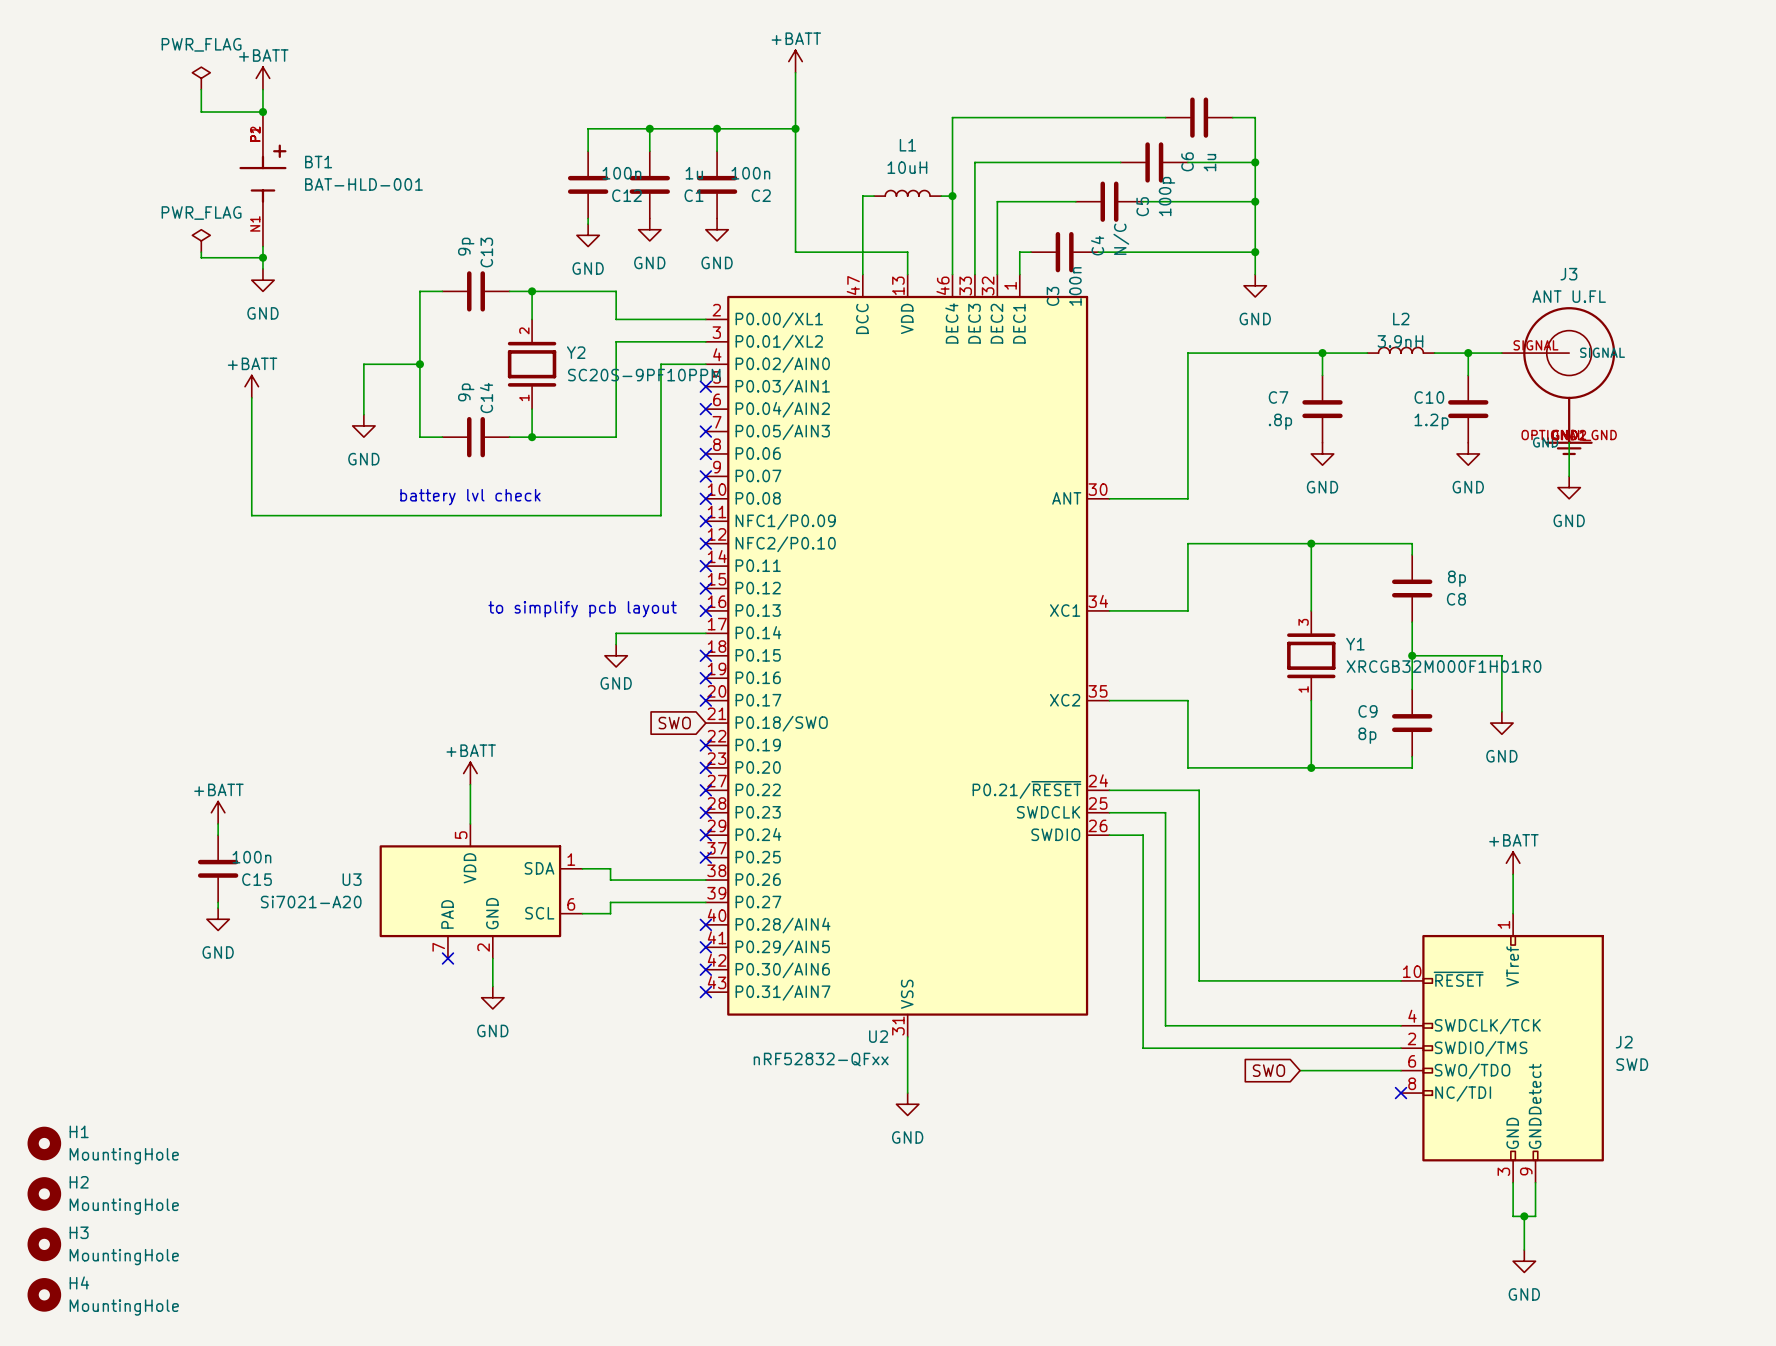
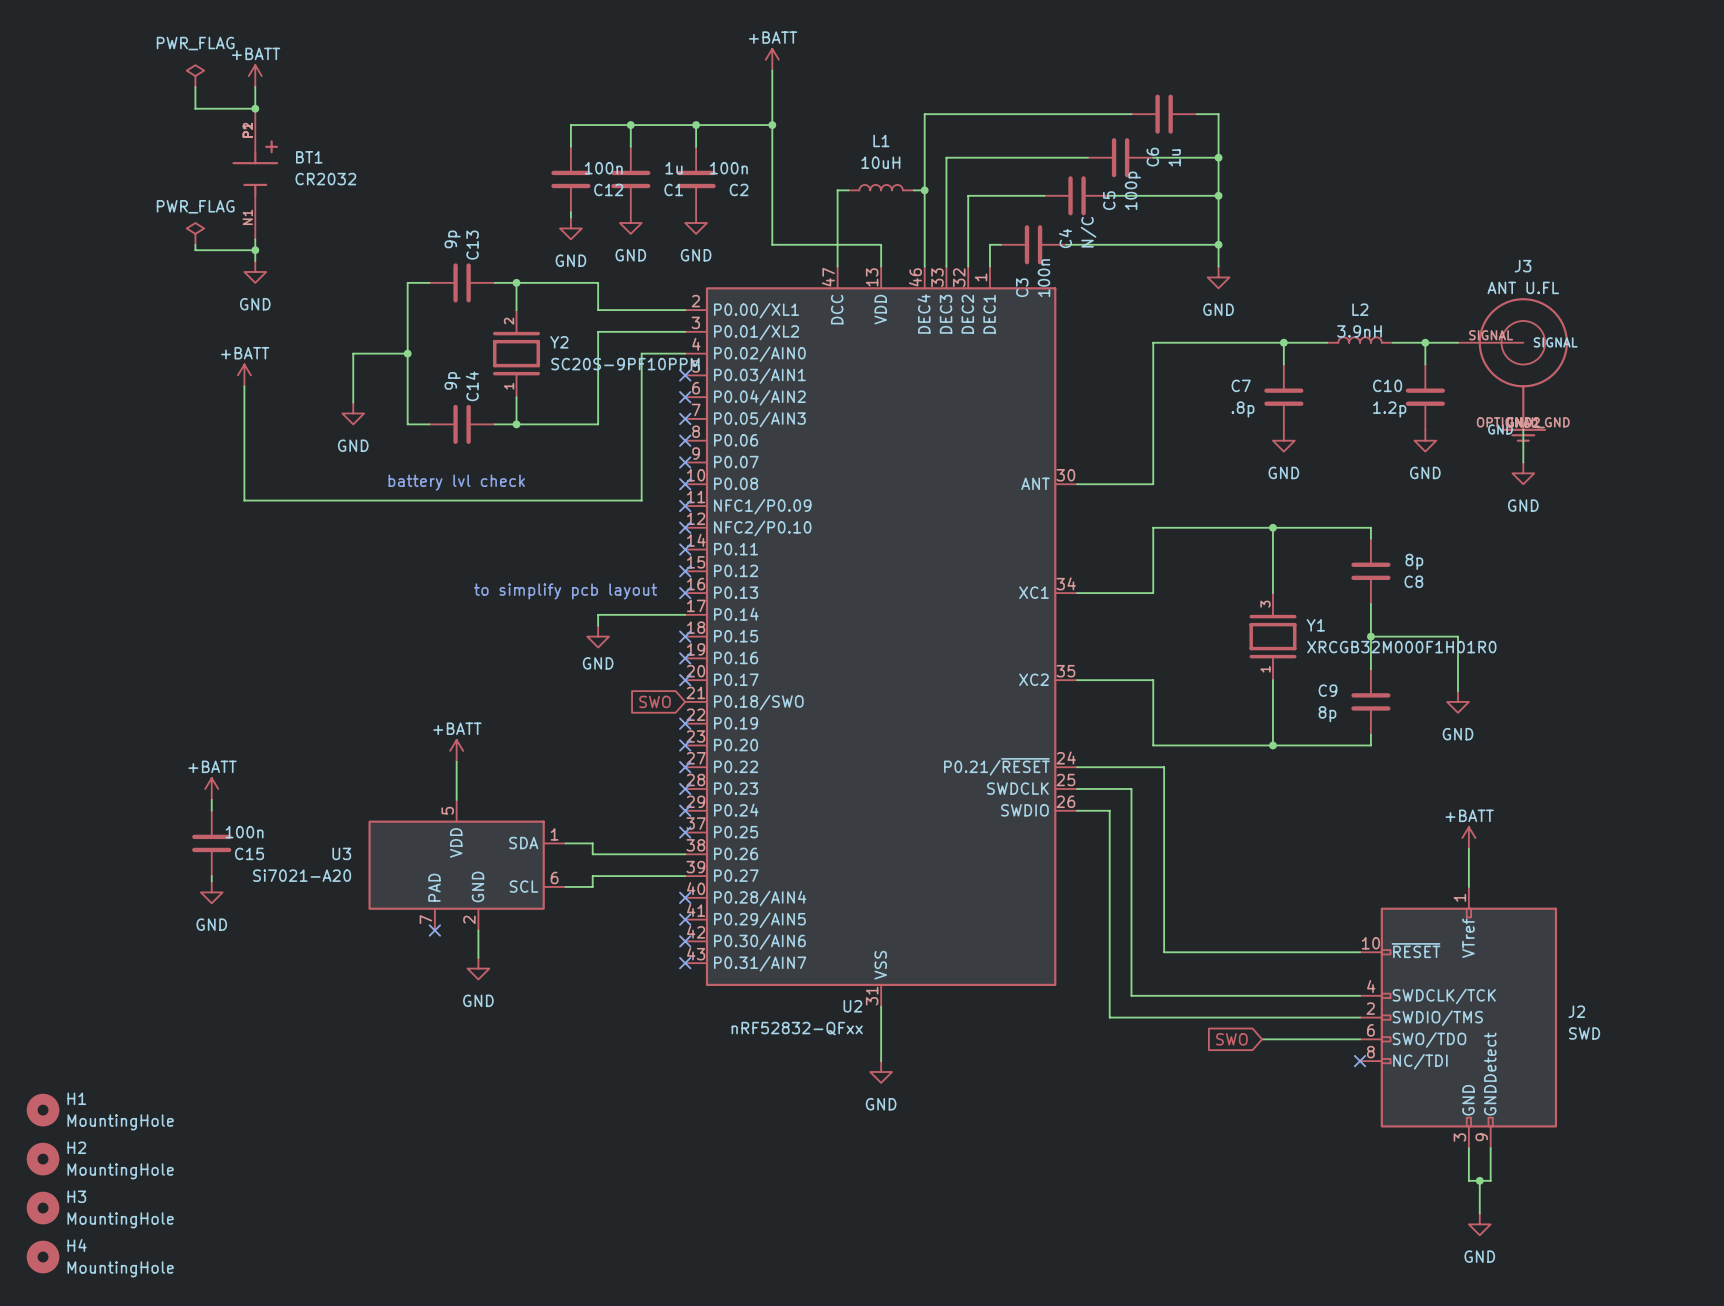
BT1 value: BAT-HLD-001 (363, 184) -> CR2032 (325, 179)

